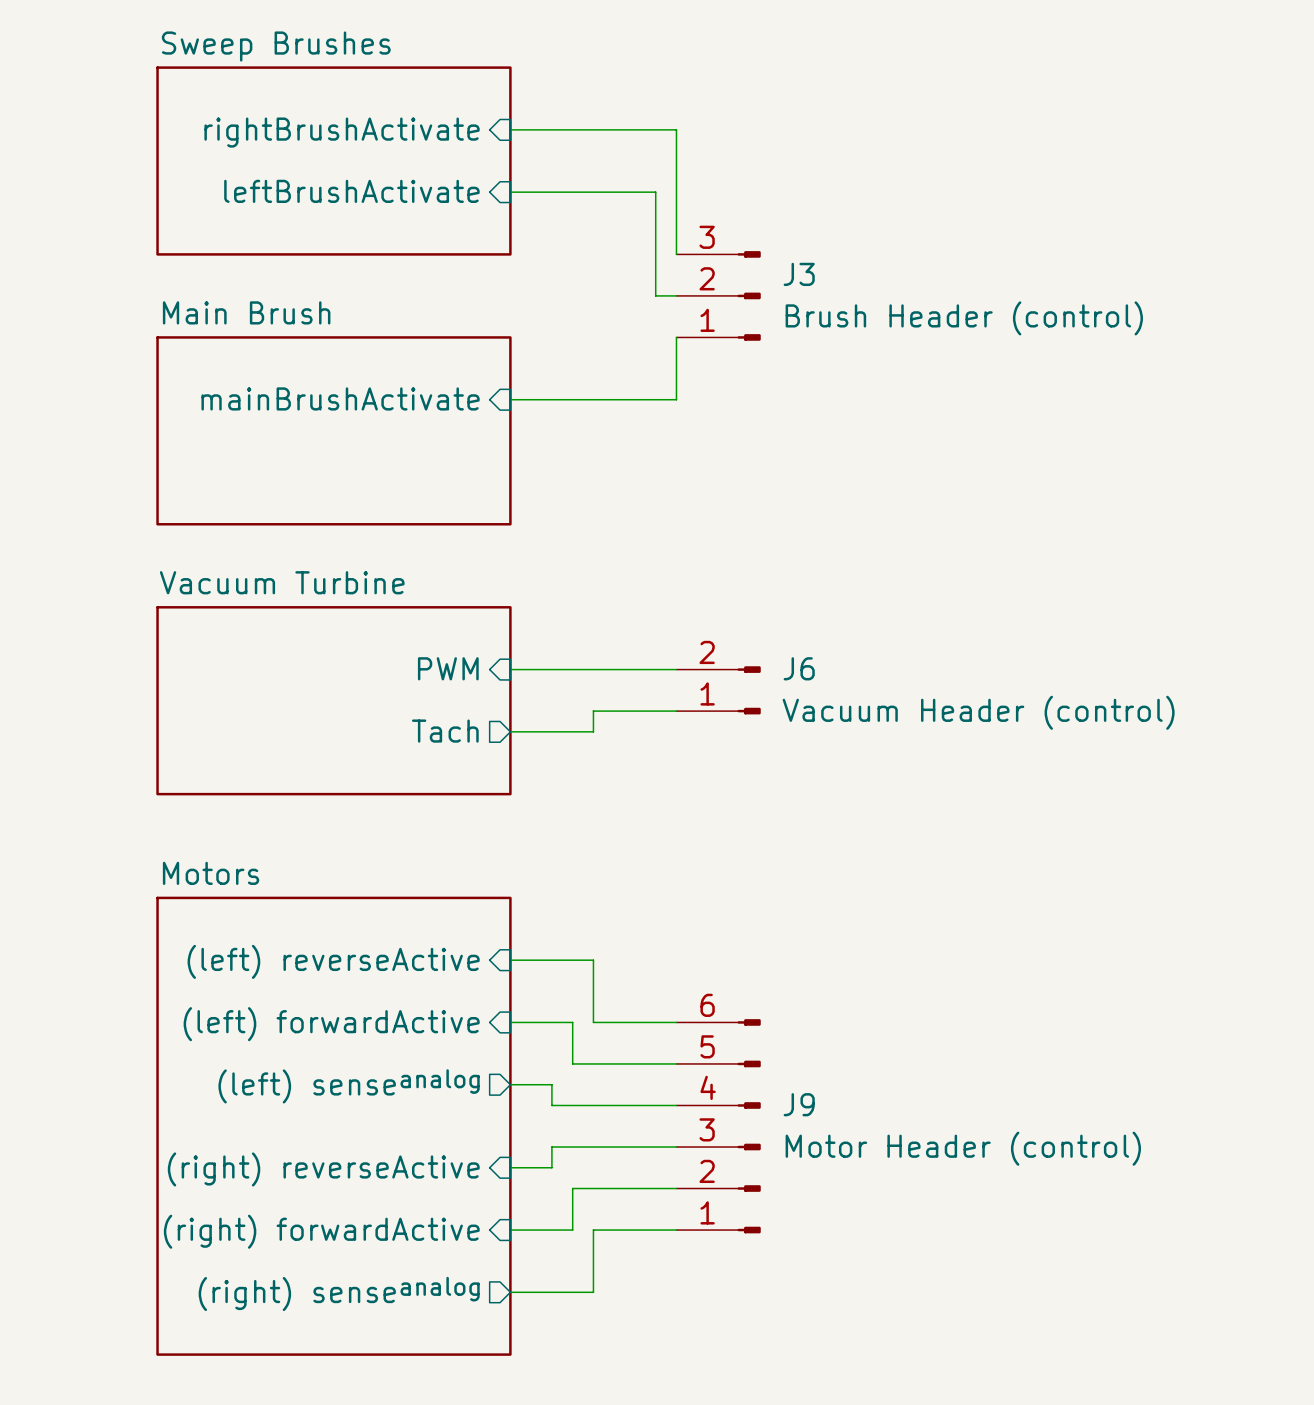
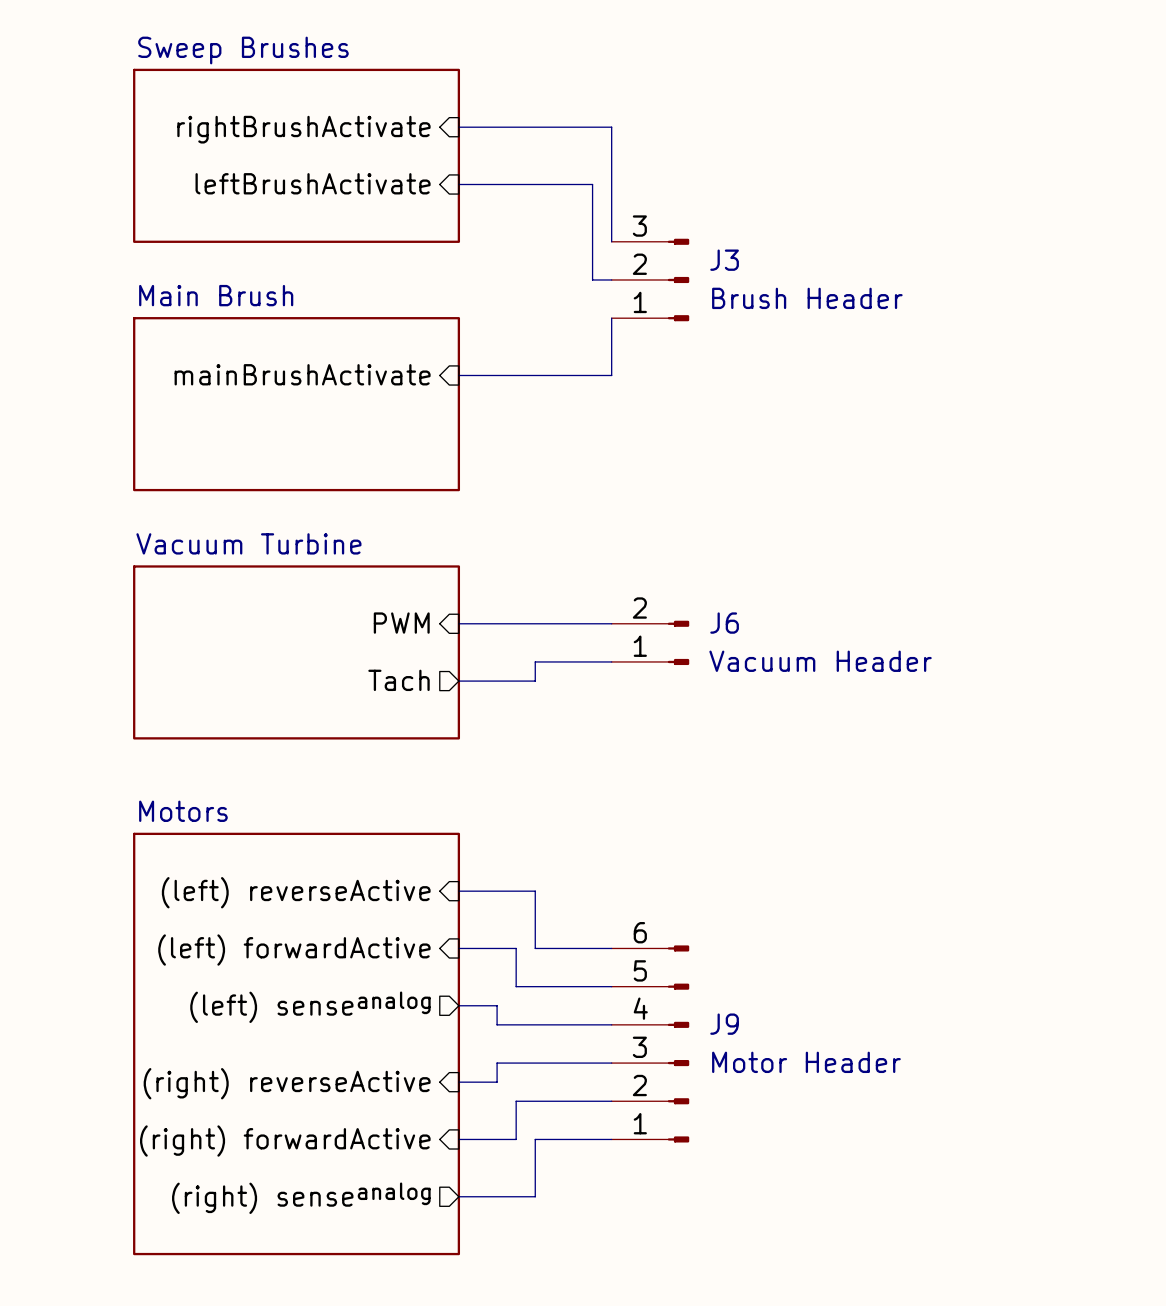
J3 value: Brush Header (control) (964, 318) -> Brush Header (807, 298)
J6 value: Vacuum Header (control) (978, 712) -> Vacuum Header (820, 661)
J9 value: Motor Header (control) (963, 1148) -> Motor Header (806, 1062)

